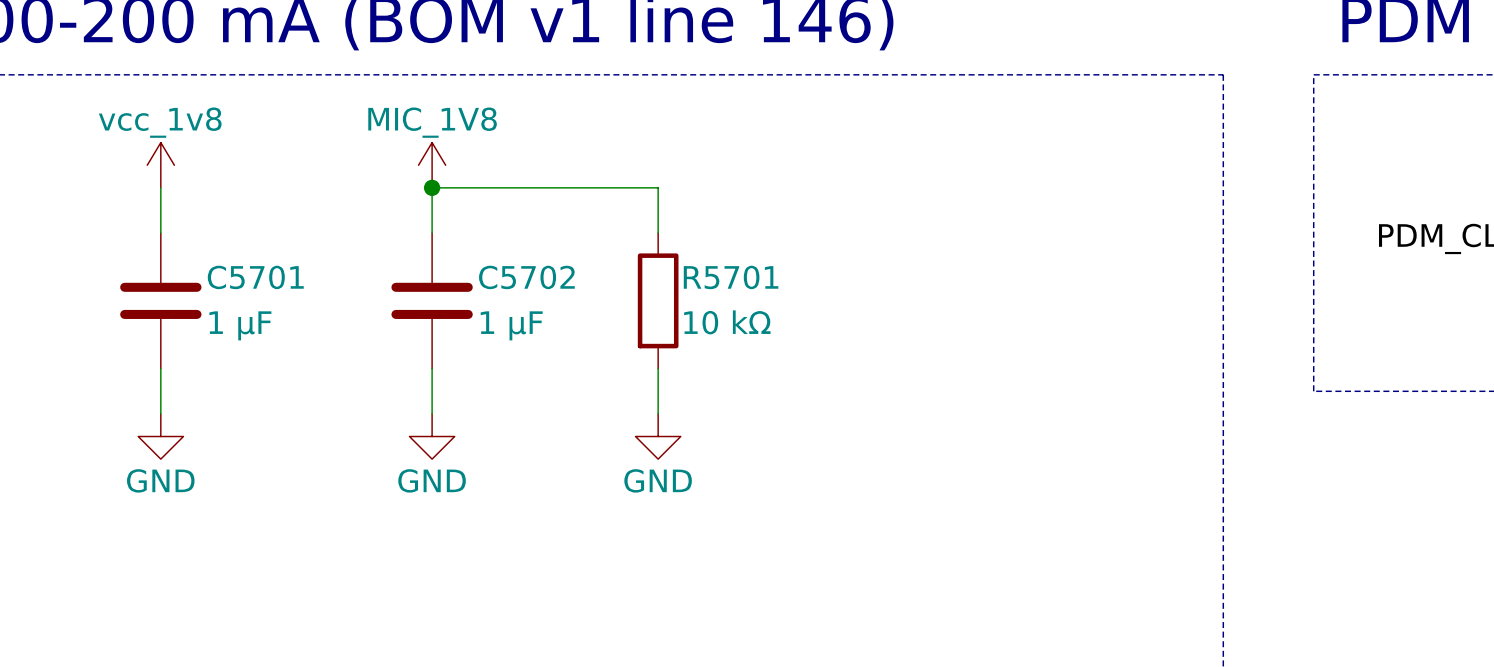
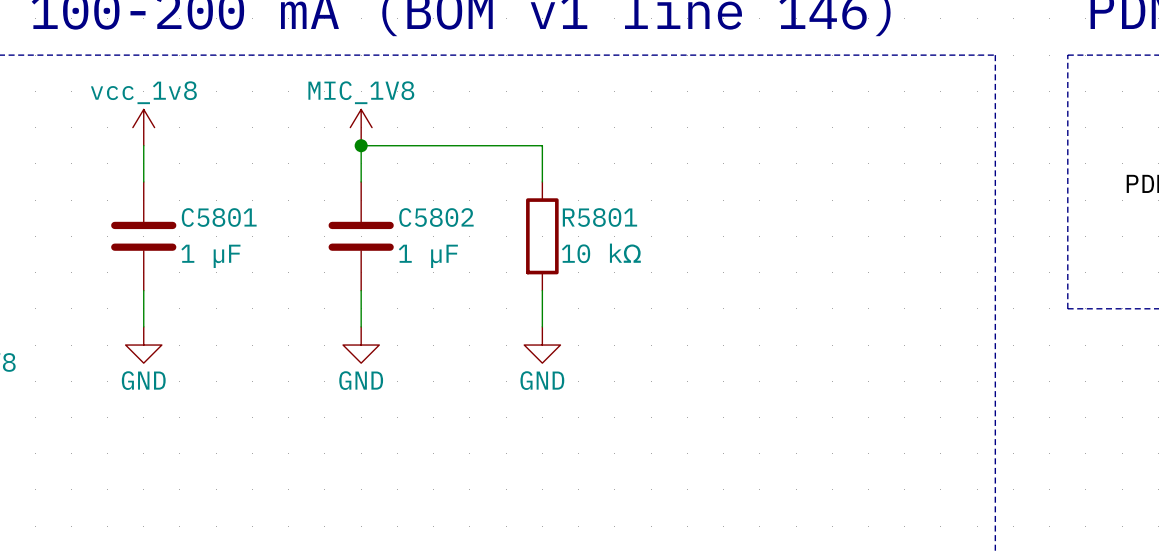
C5701 name: C5701 (255, 277) -> C5801 (219, 217)
C5702 name: C5702 (526, 277) -> C5802 (436, 217)
R5701 name: R5701 (731, 277) -> R5801 (599, 217)

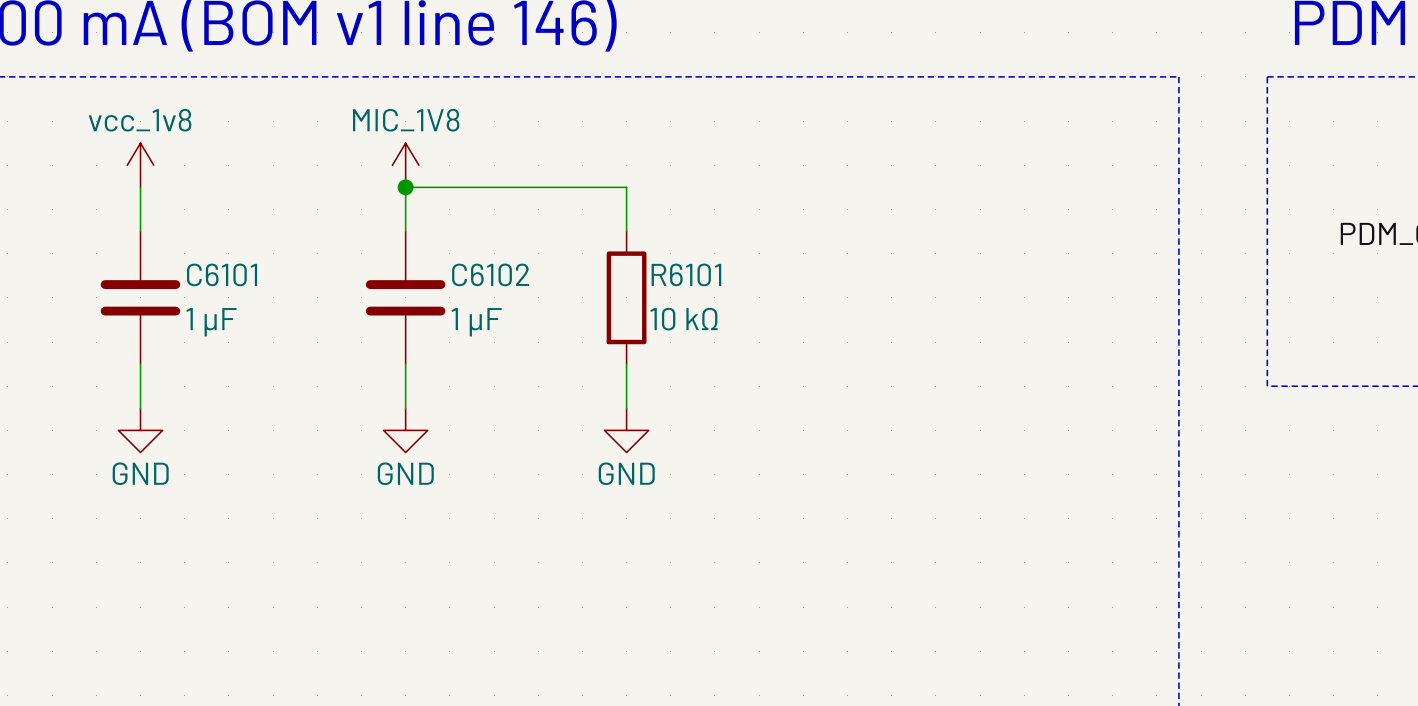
C5801 name: C5801 (219, 217) -> C6101 (222, 274)
C5802 name: C5802 (436, 217) -> C6102 (490, 274)
R5801 name: R5801 (599, 217) -> R6101 (686, 274)

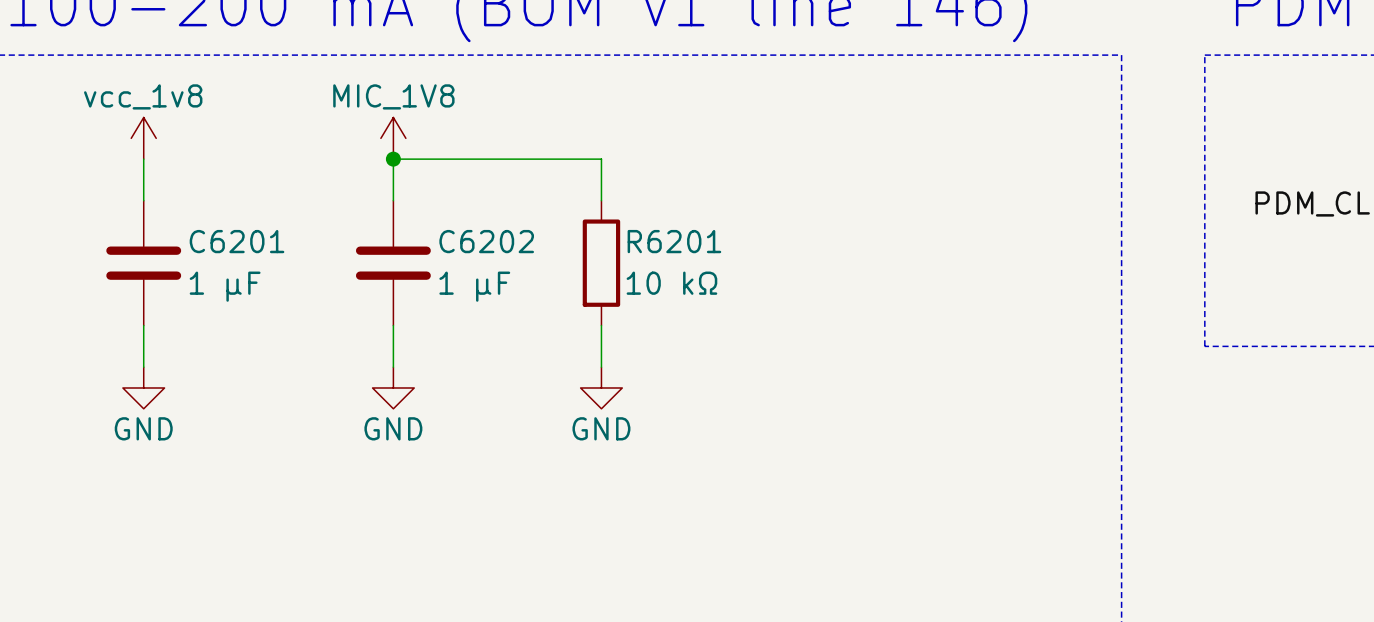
C6101 name: C6101 (222, 274) -> C6201 (237, 241)
C6102 name: C6102 (490, 274) -> C6202 (486, 241)
R6101 name: R6101 (686, 274) -> R6201 (674, 241)

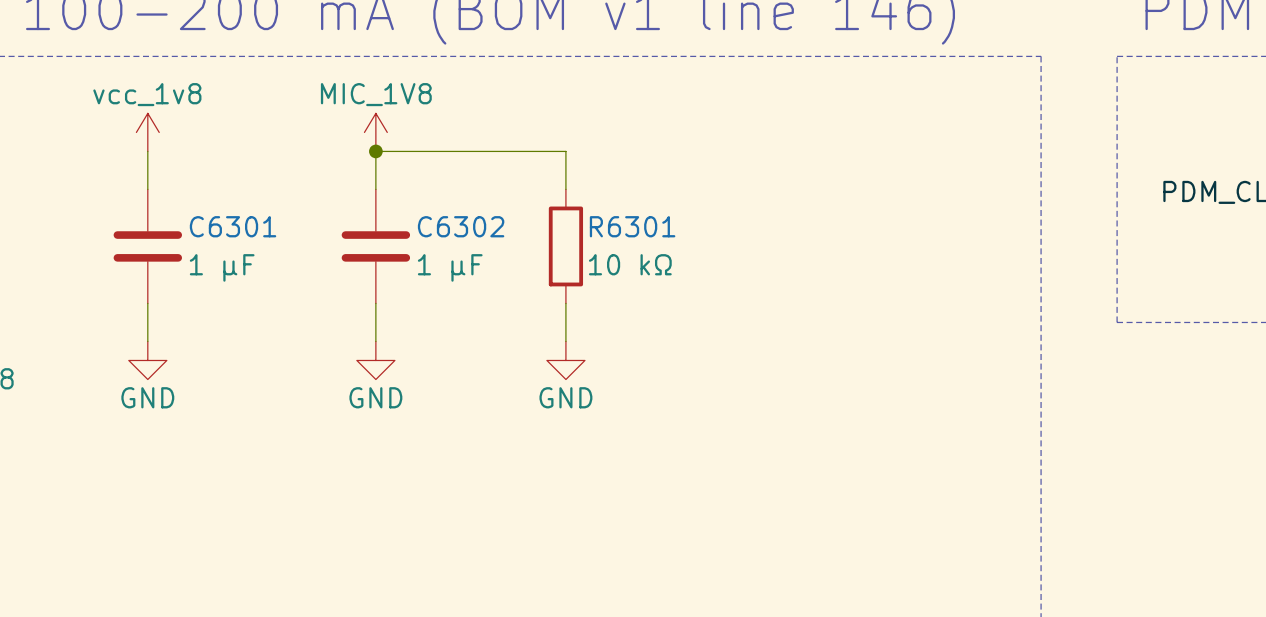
C6201 name: C6201 (237, 241) -> C6301 (233, 226)
C6202 name: C6202 (486, 241) -> C6302 (461, 226)
R6201 name: R6201 (674, 241) -> R6301 (632, 226)

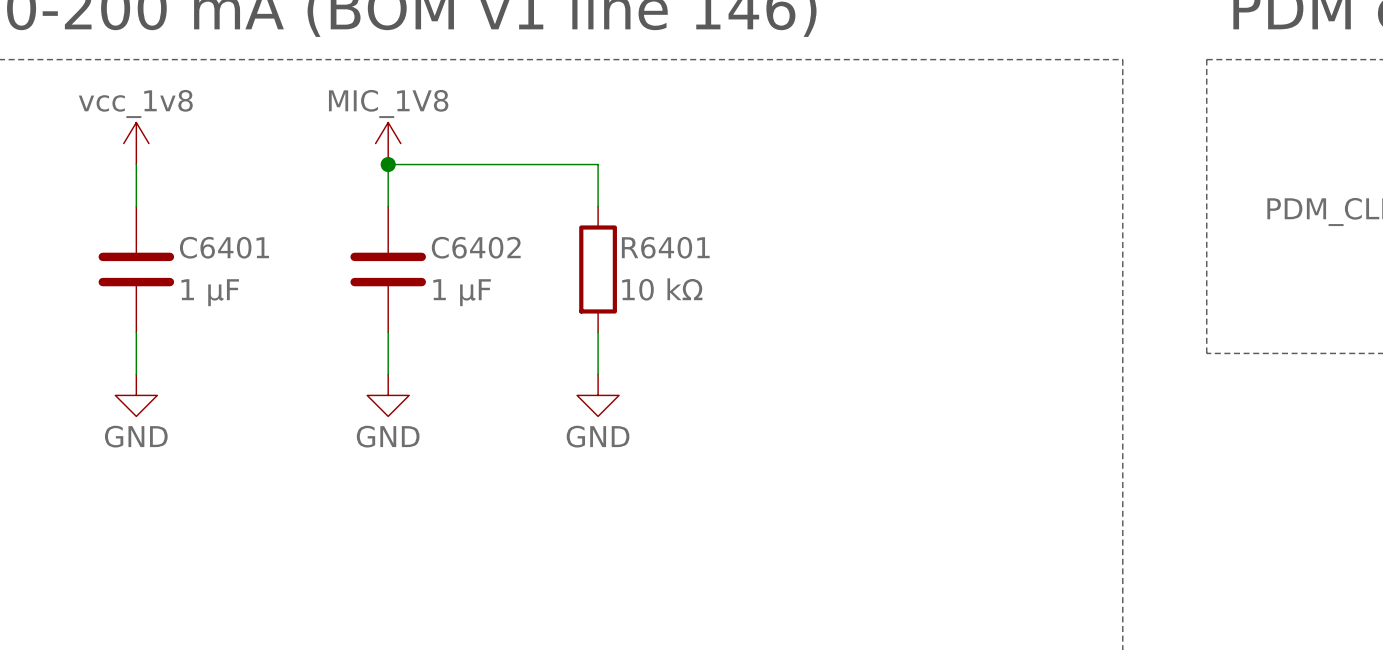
C6301 name: C6301 (233, 226) -> C6401 (224, 247)
C6302 name: C6302 (461, 226) -> C6402 (476, 247)
R6301 name: R6301 (632, 226) -> R6401 (665, 247)

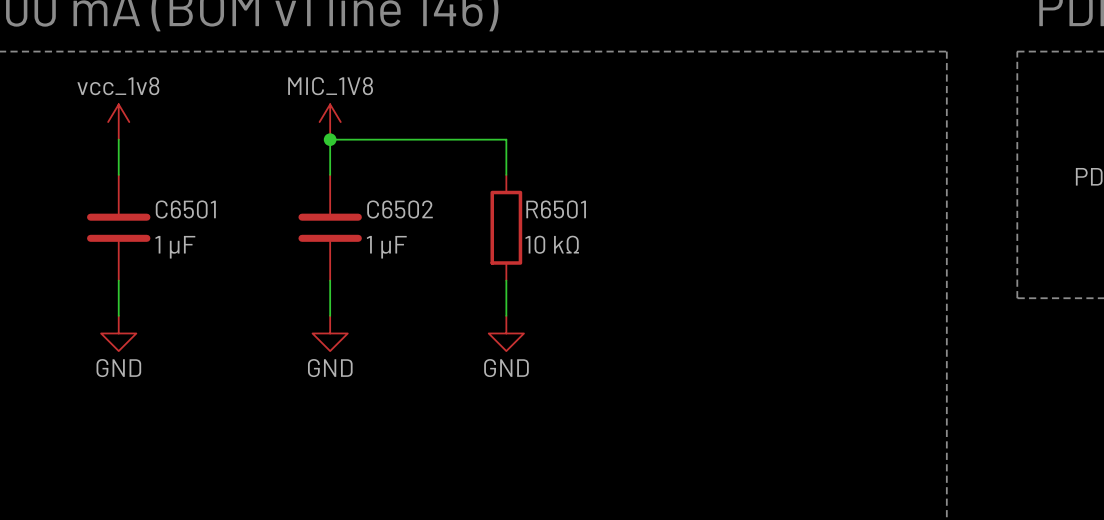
C6401 name: C6401 (224, 247) -> C6501 (185, 209)
C6402 name: C6402 (476, 247) -> C6502 (400, 209)
R6401 name: R6401 (665, 247) -> R6501 (556, 209)

